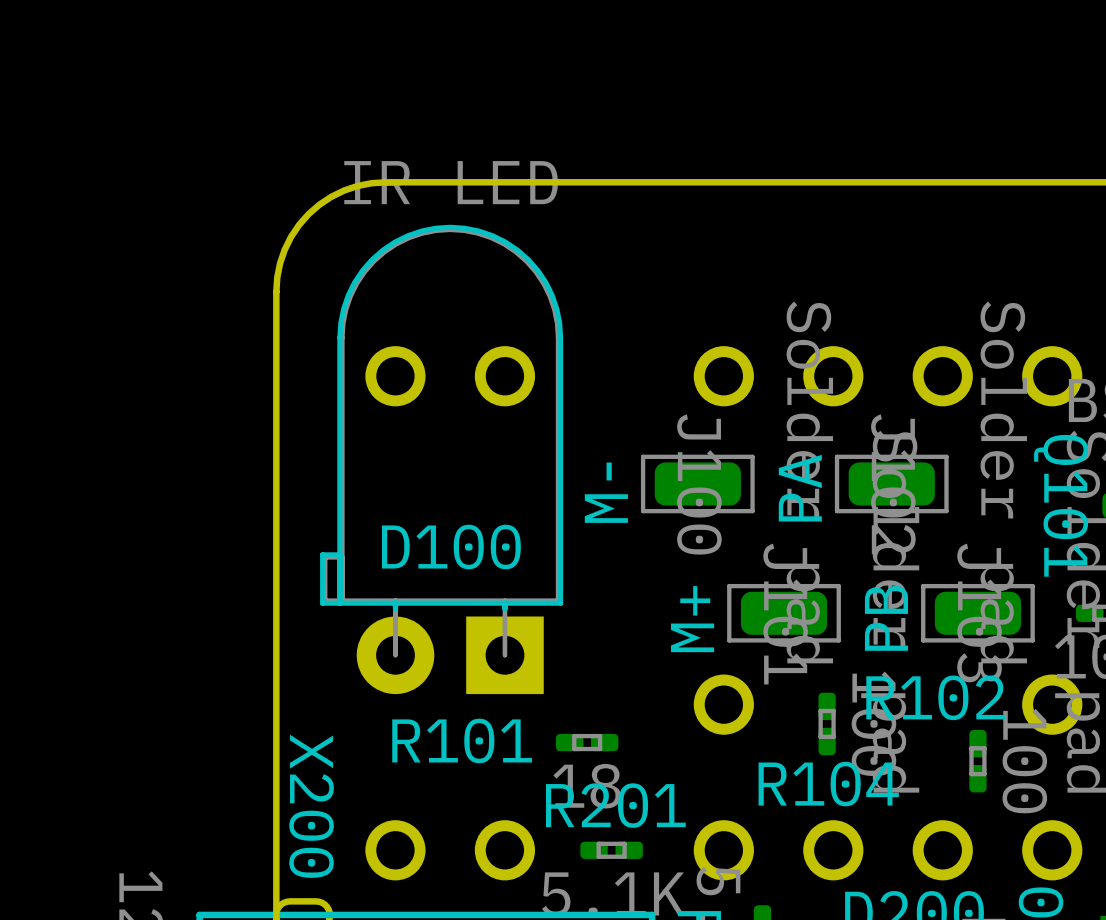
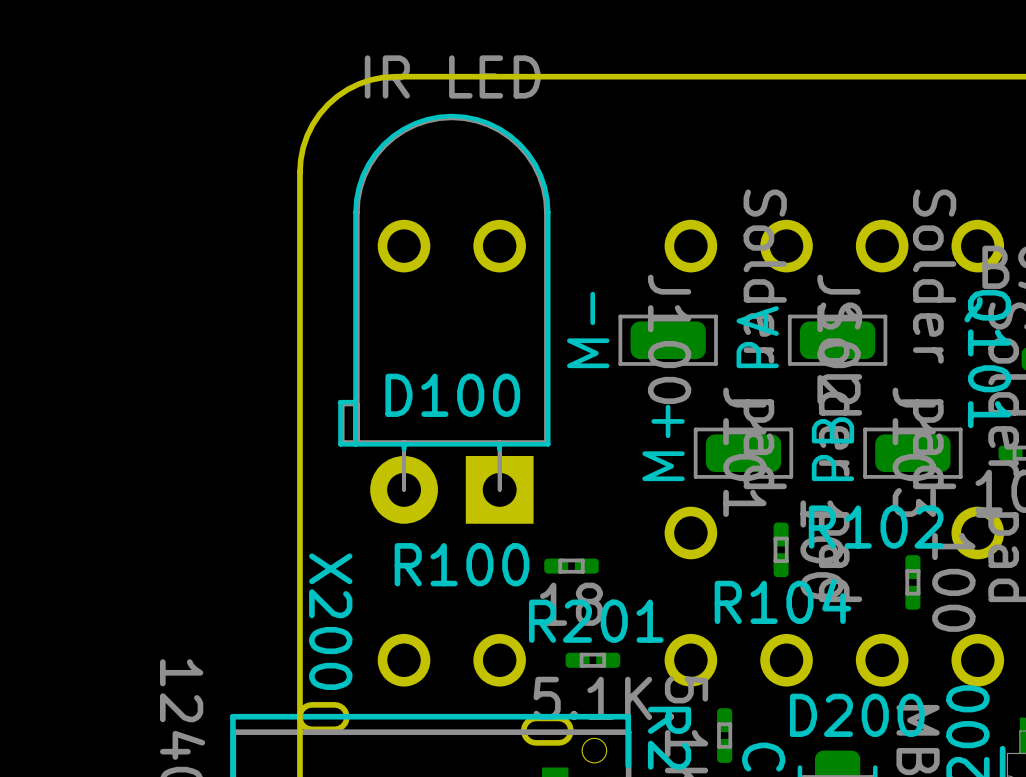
R101 name: R101 (462, 740) -> R100 (462, 564)

